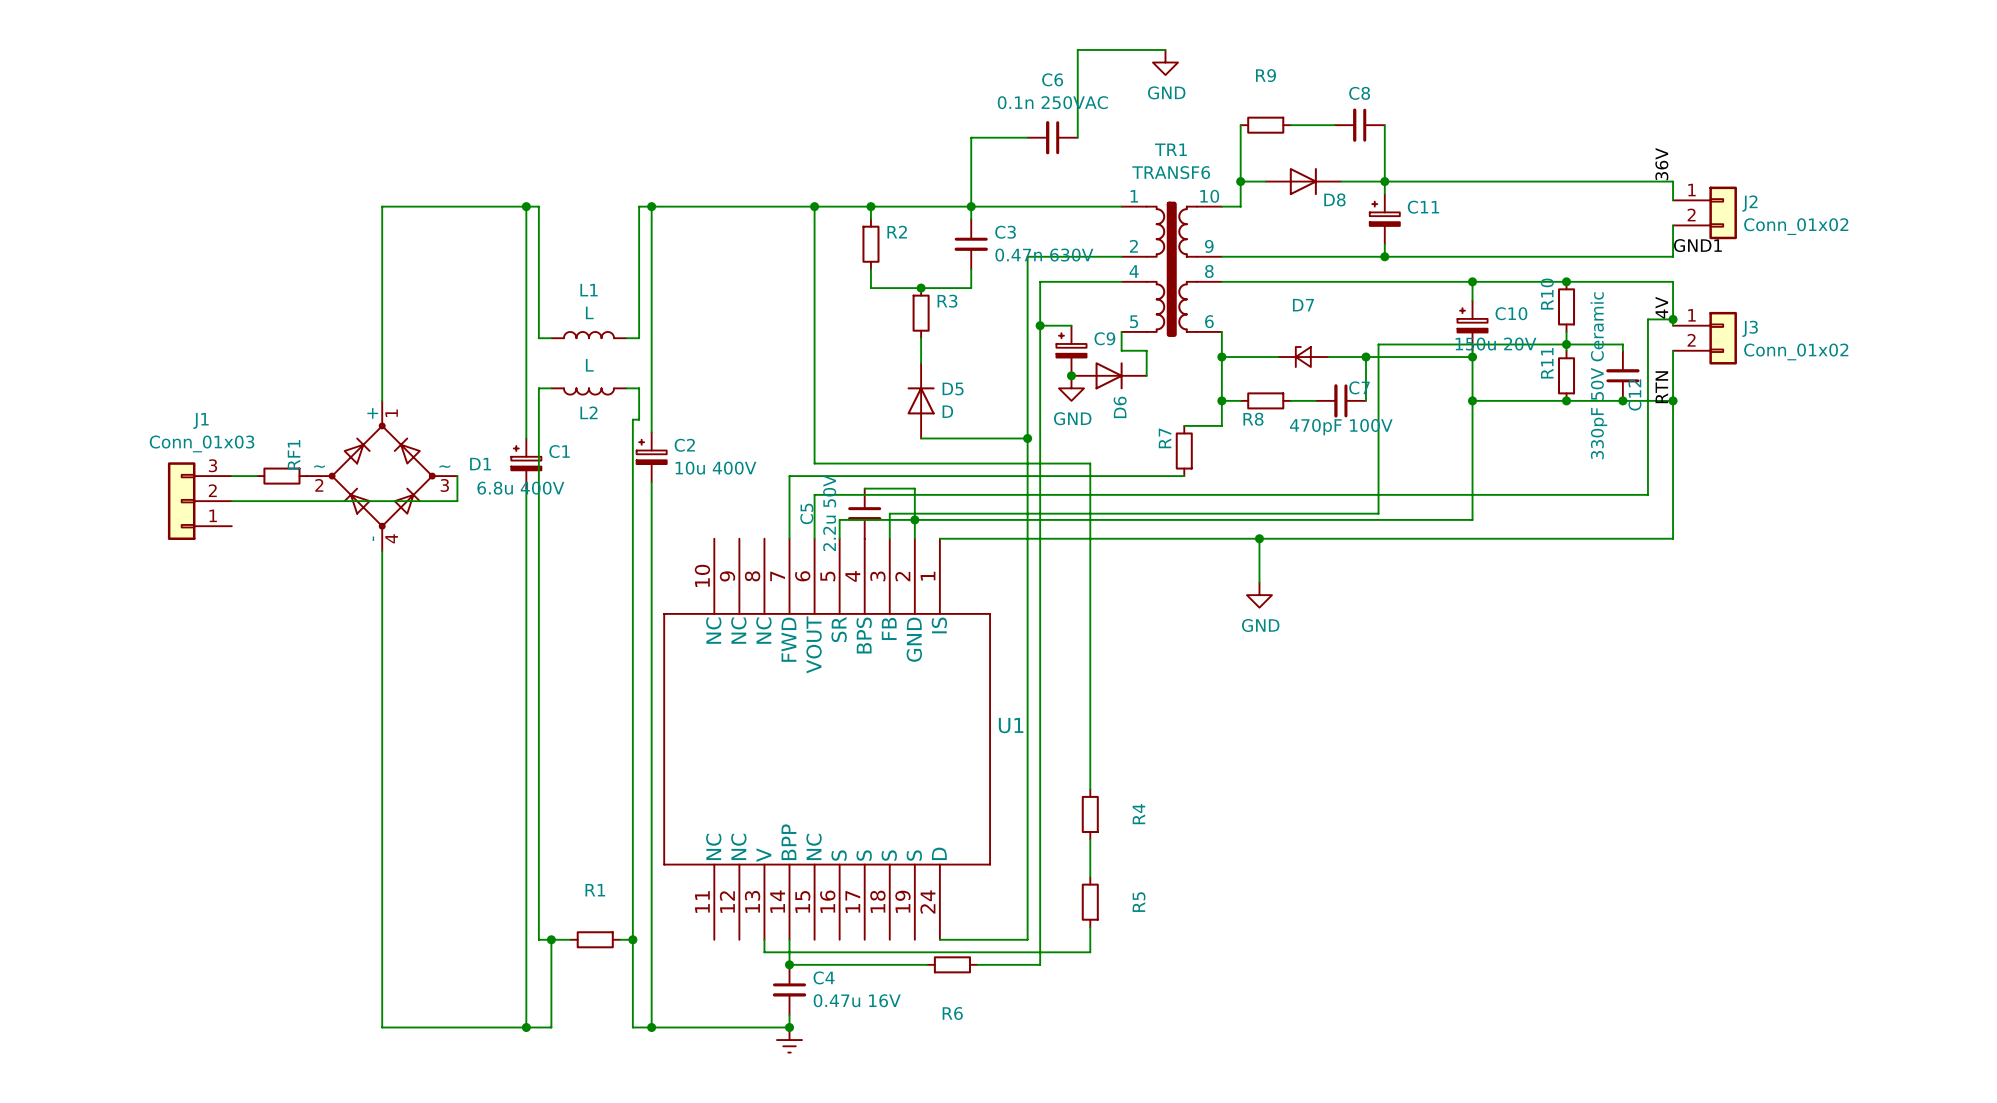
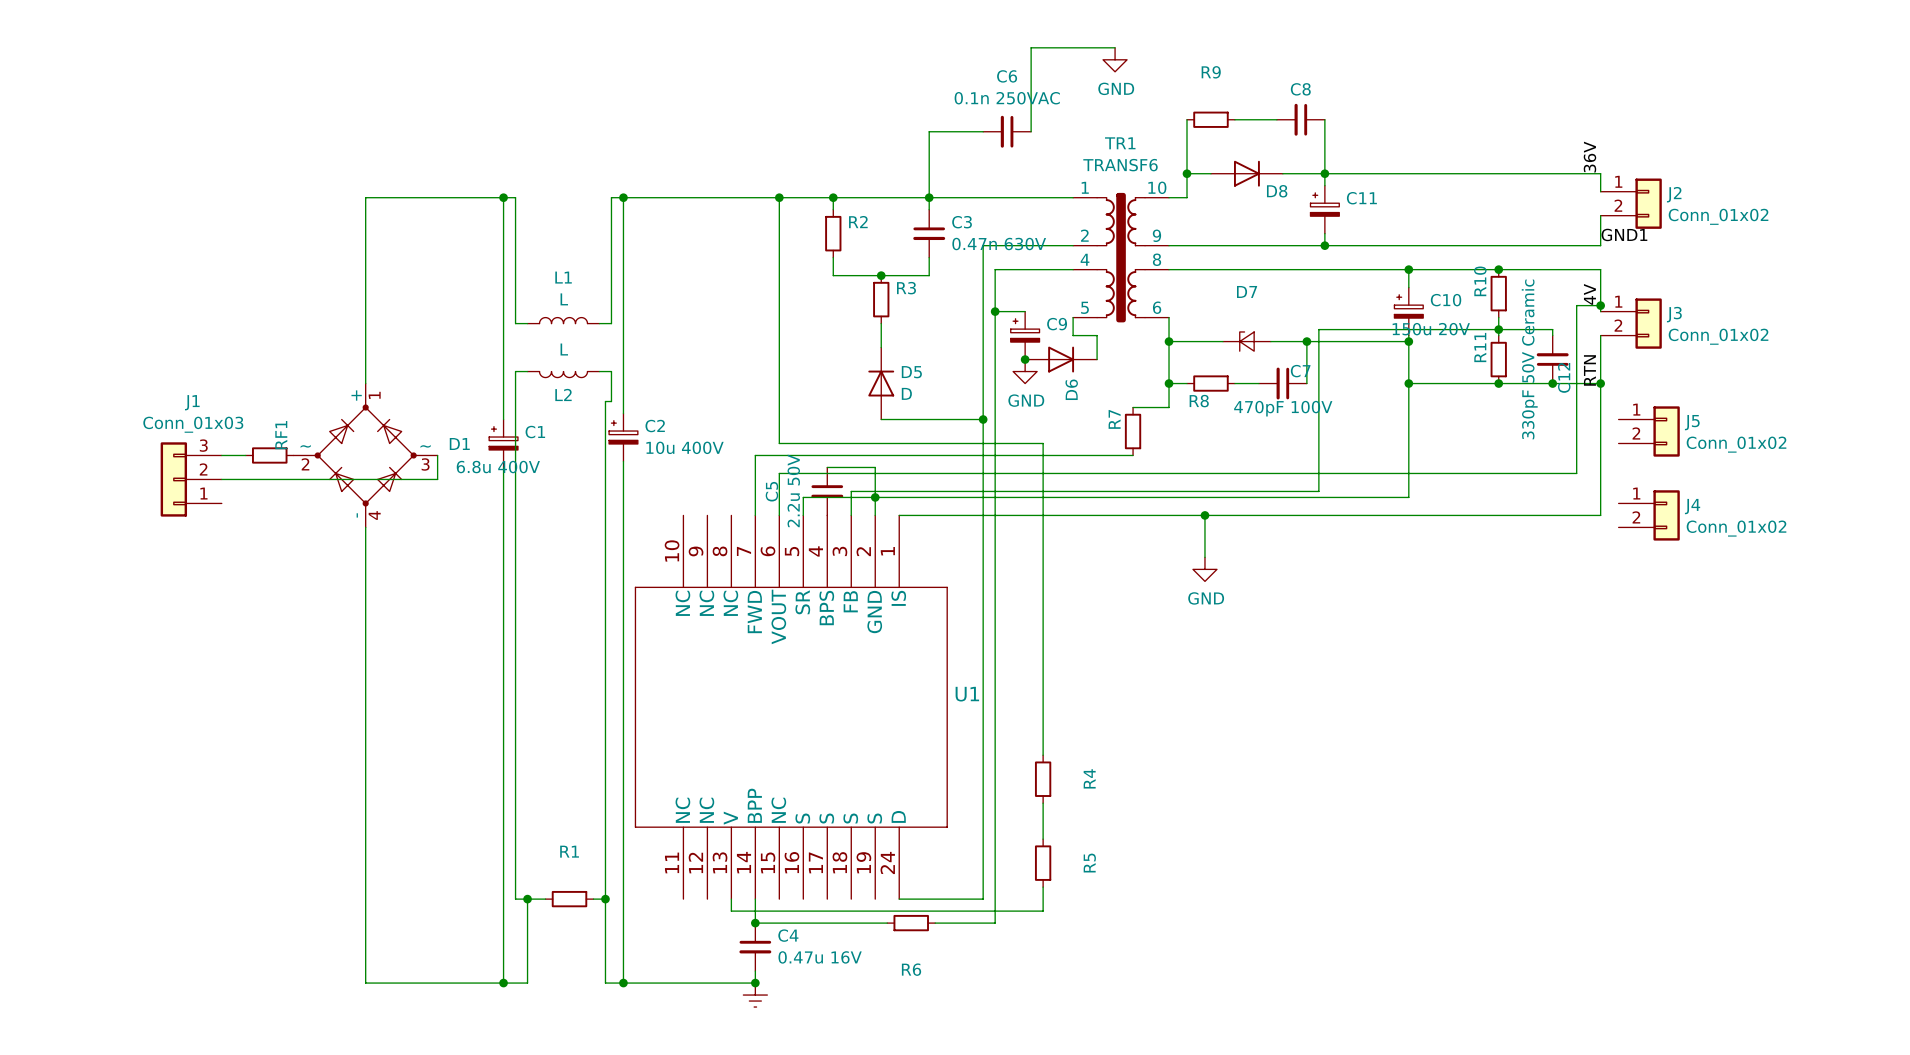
J5: none -> Conn_01x02 (1649, 431)
J4: none -> Conn_01x02 (1649, 515)

